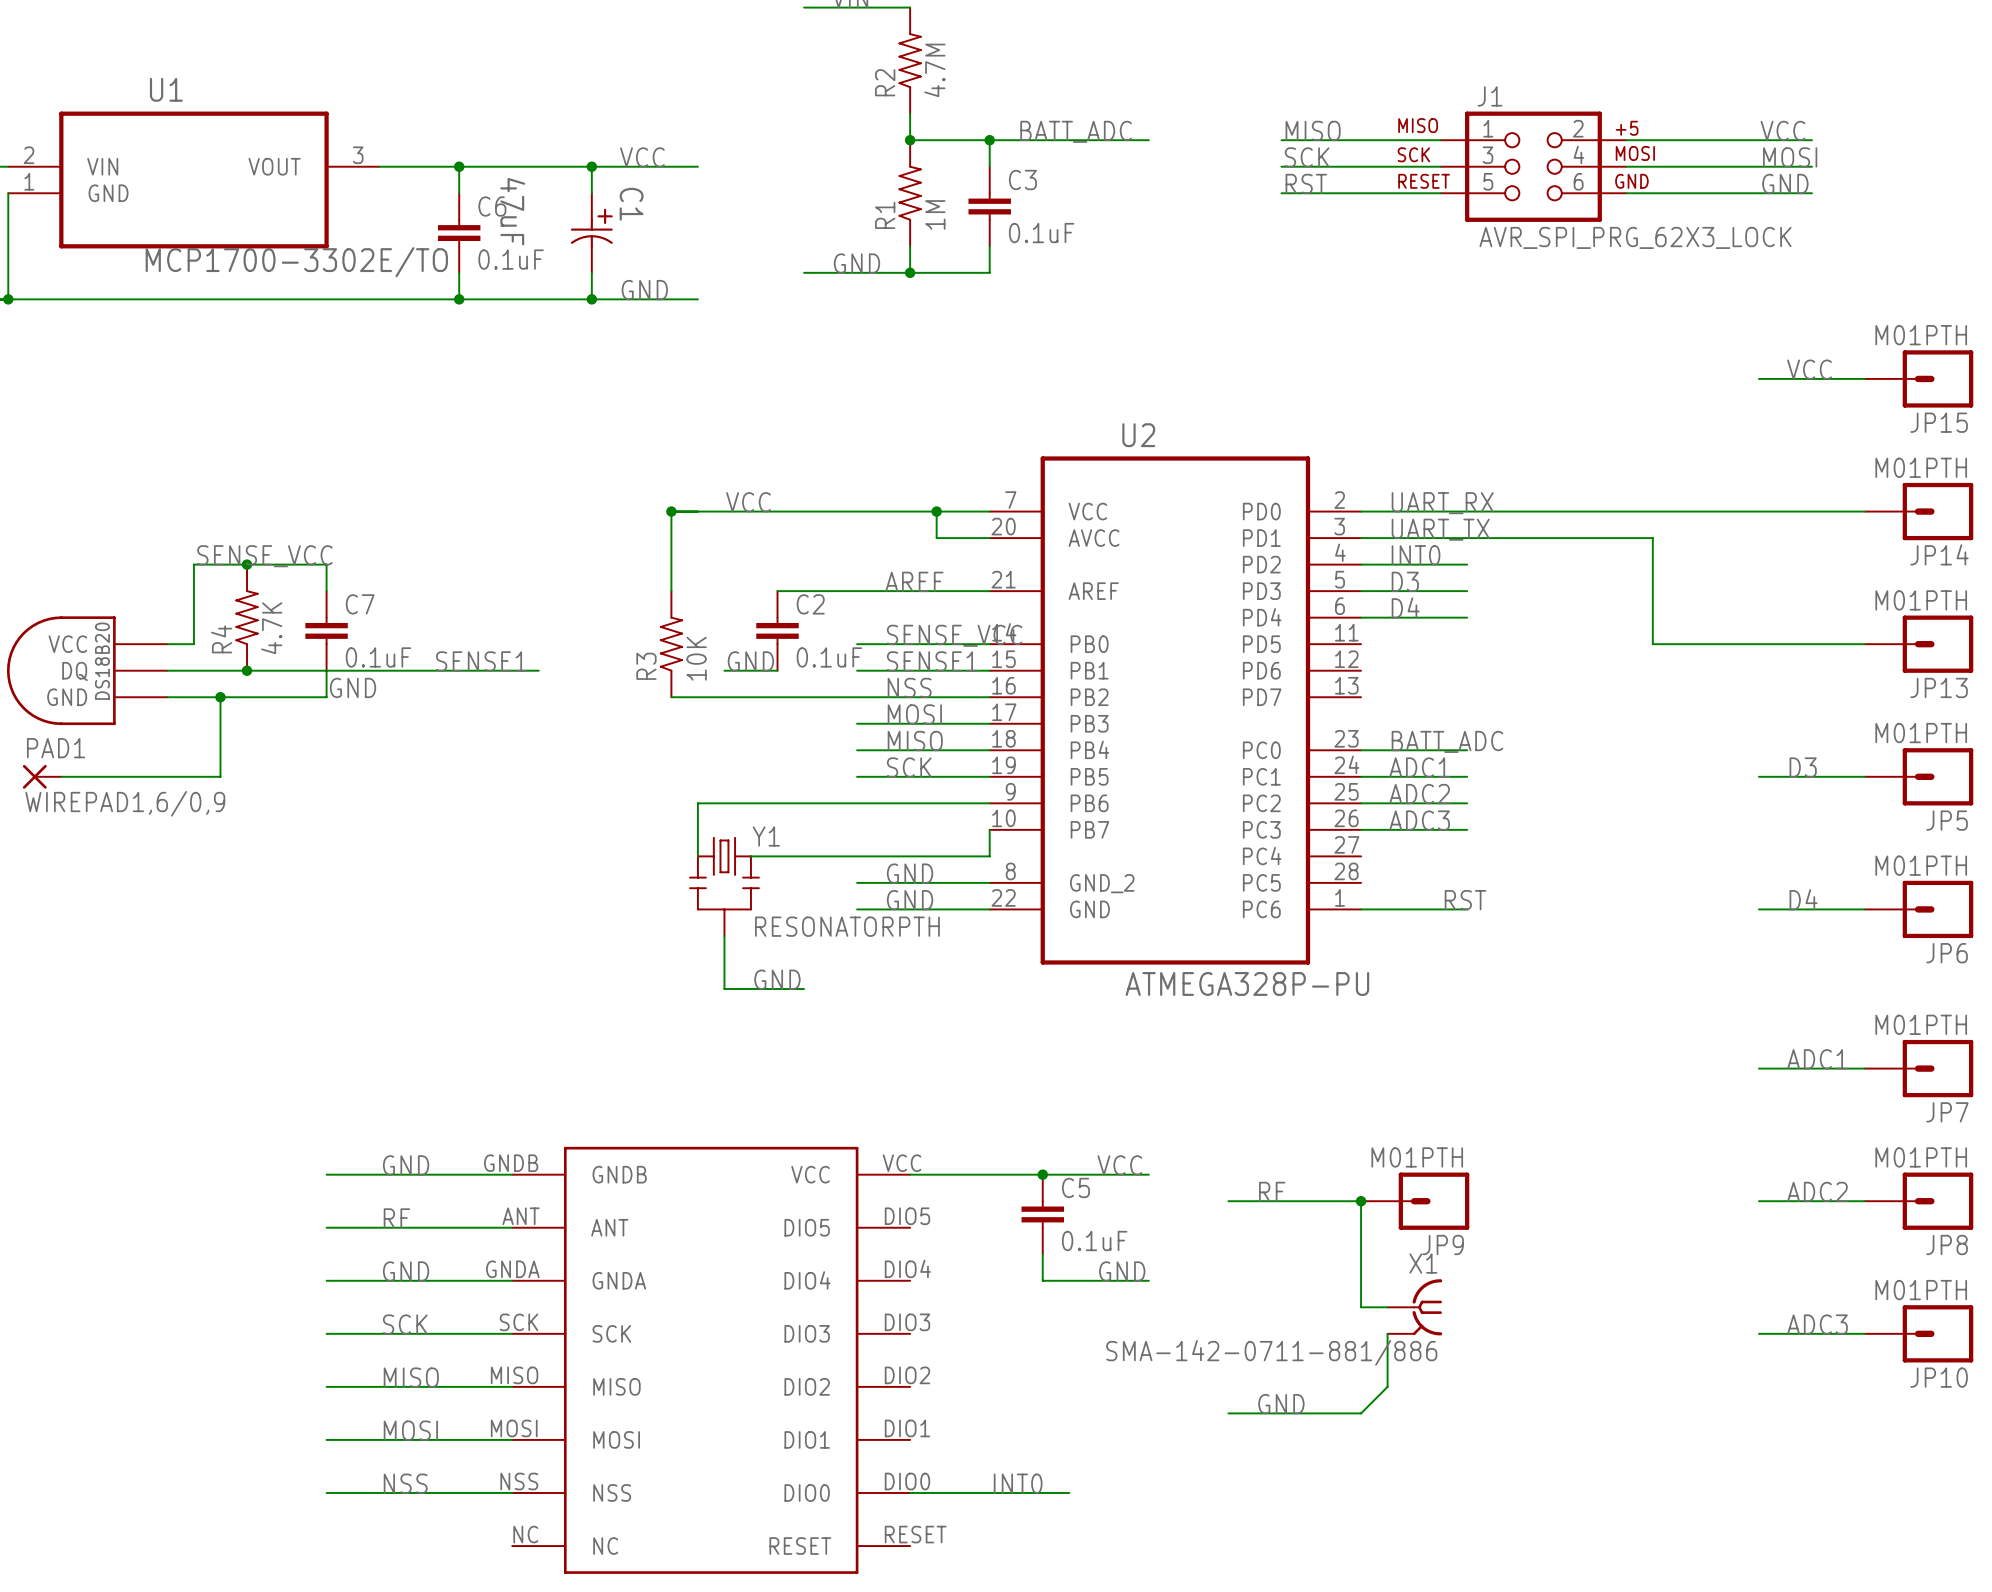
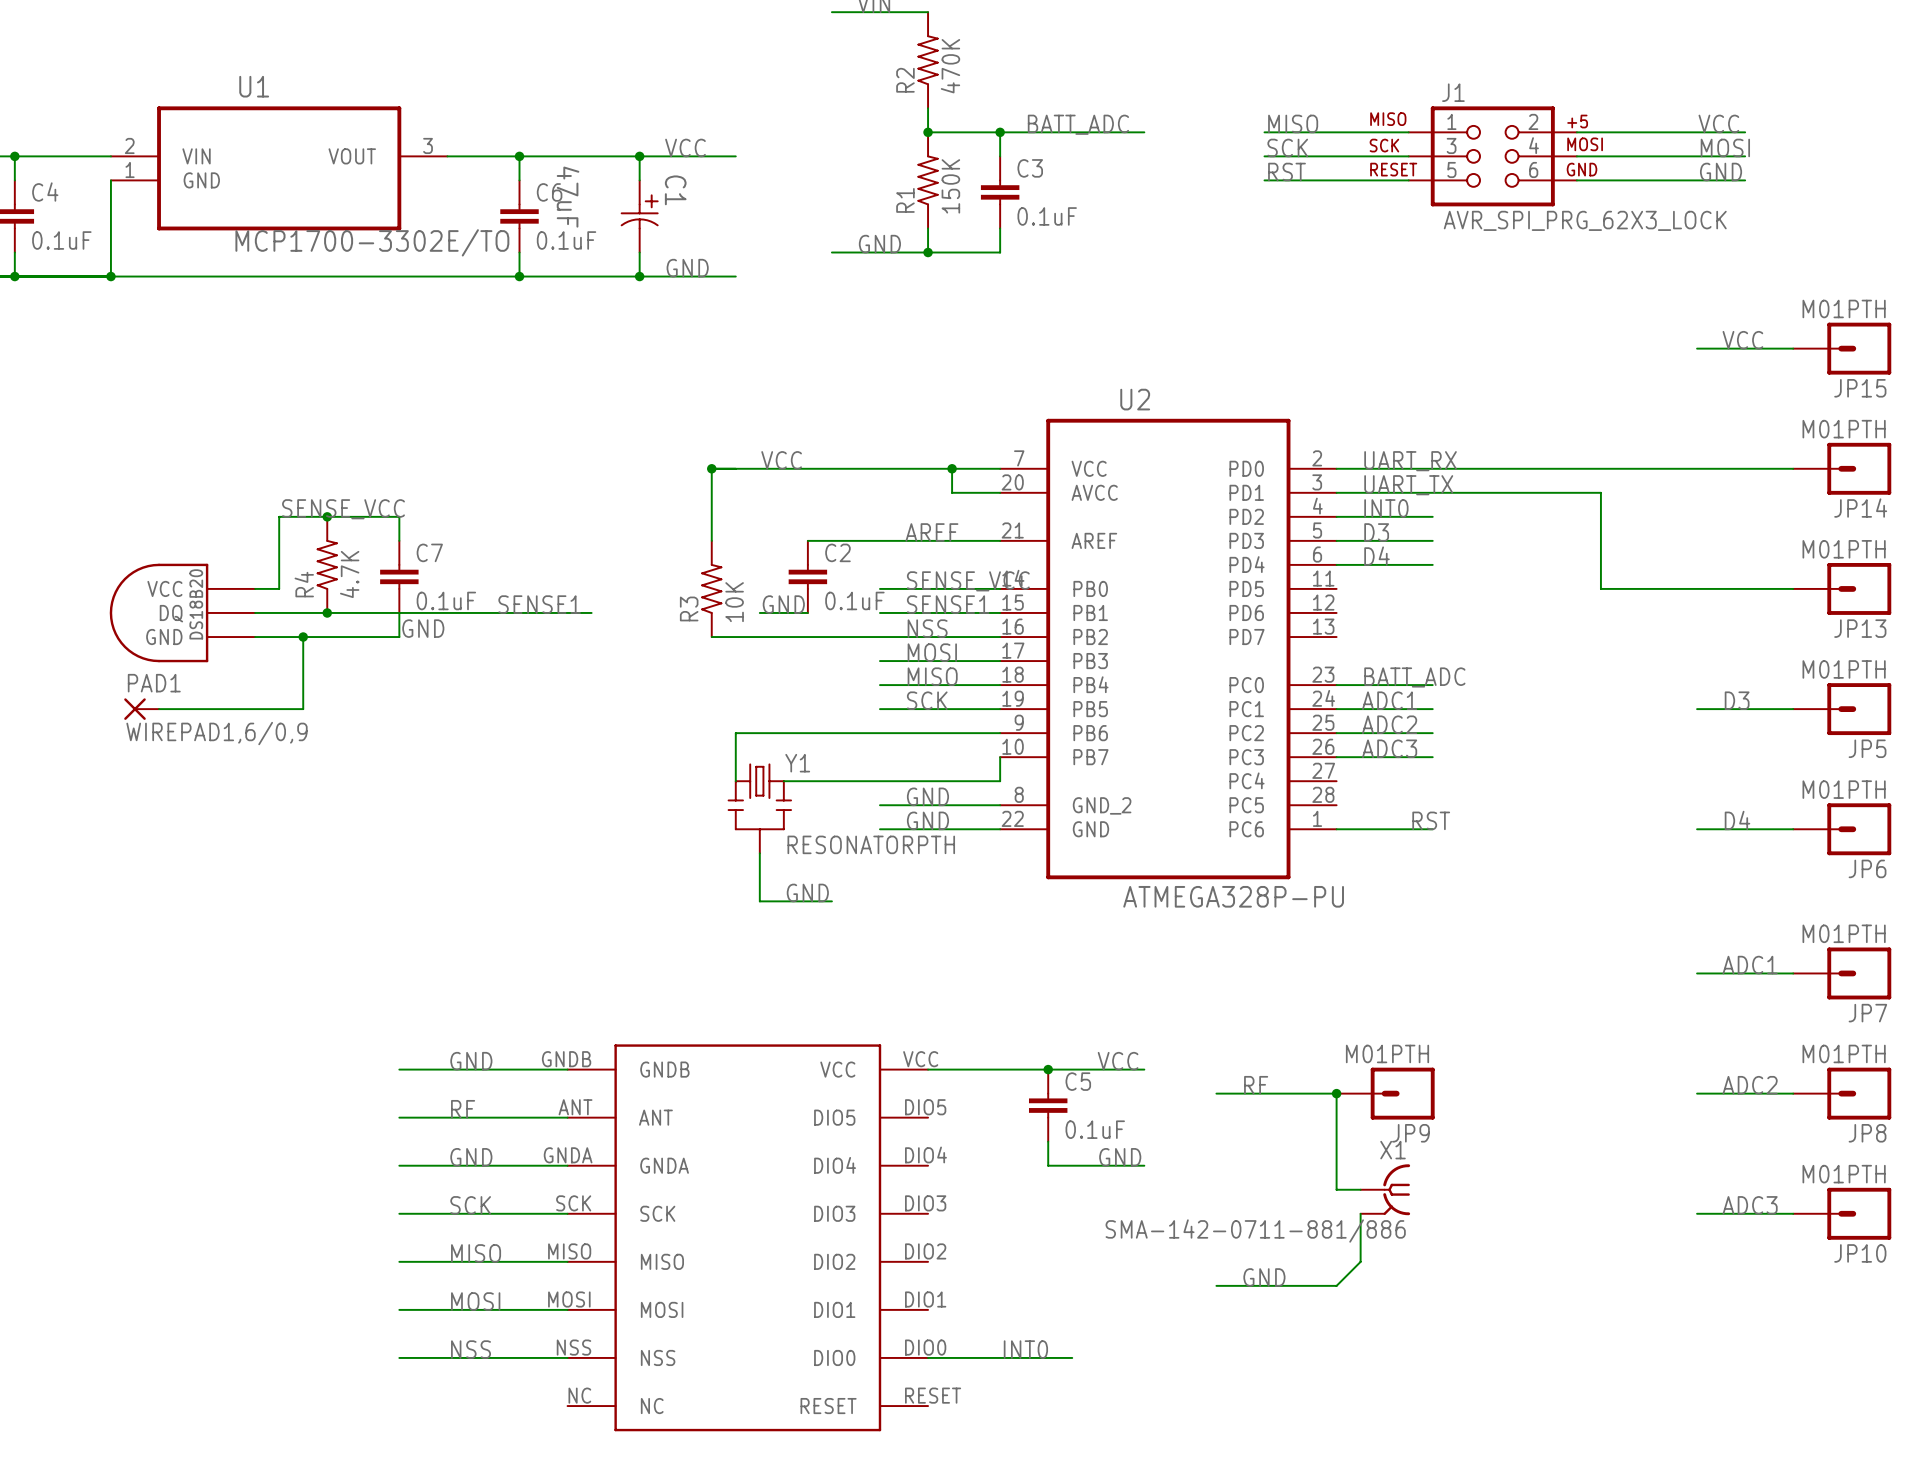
R2 value: 4.7M (934, 70) -> 470K (950, 66)
R1 value: 1M (935, 214) -> 150K (950, 186)

